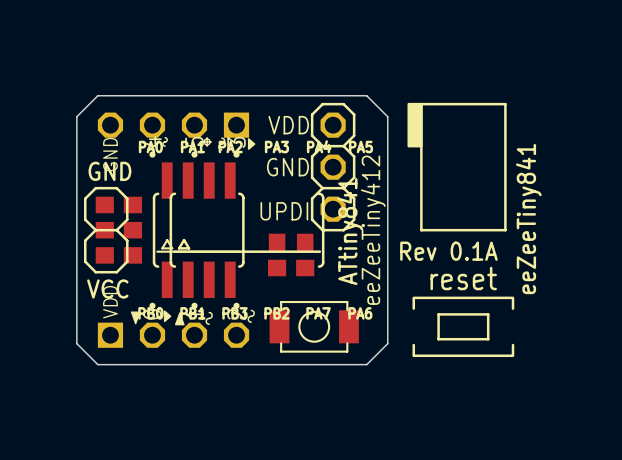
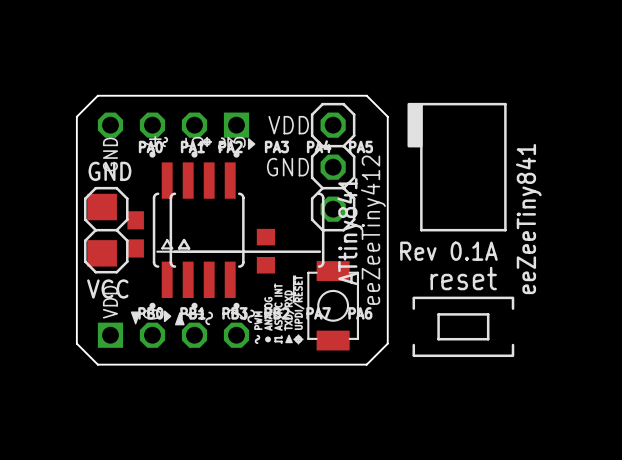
part: (118, 204) -> none
part value: UPDI (284, 211) -> none
part: none -> (102, 230)
part: (118, 230) -> none
part: none -> (135, 234)
part rotation: 0° (291, 242) -> 90° clockwise (265, 251)
part: (118, 255) -> none
part: (291, 268) -> none
part rotation: 0° (314, 326) -> 90° clockwise (333, 305)
drawing: none -> [255, 334, 304, 345]

